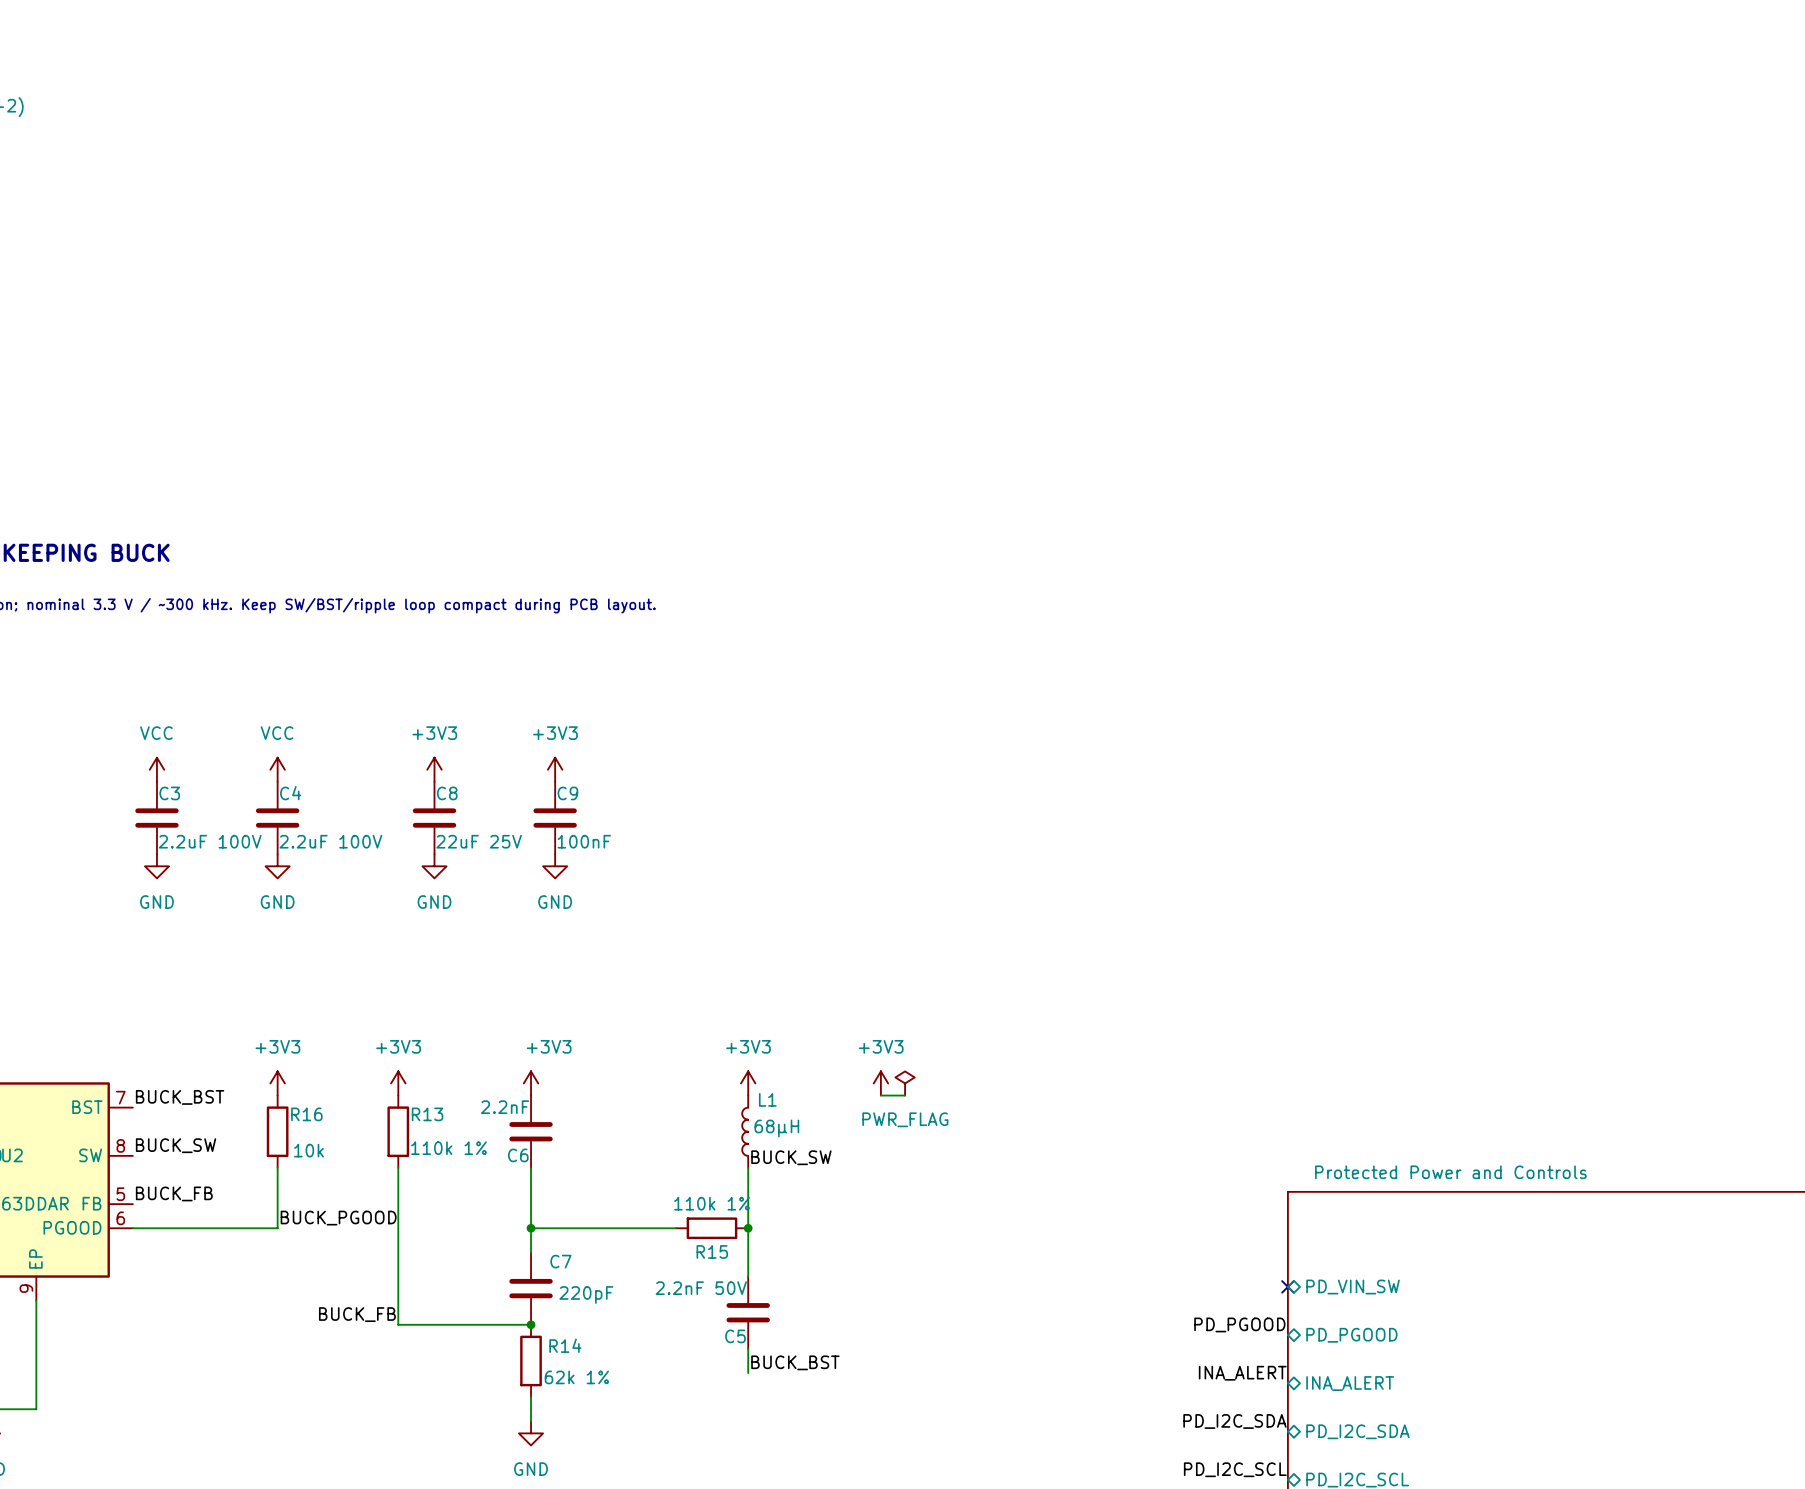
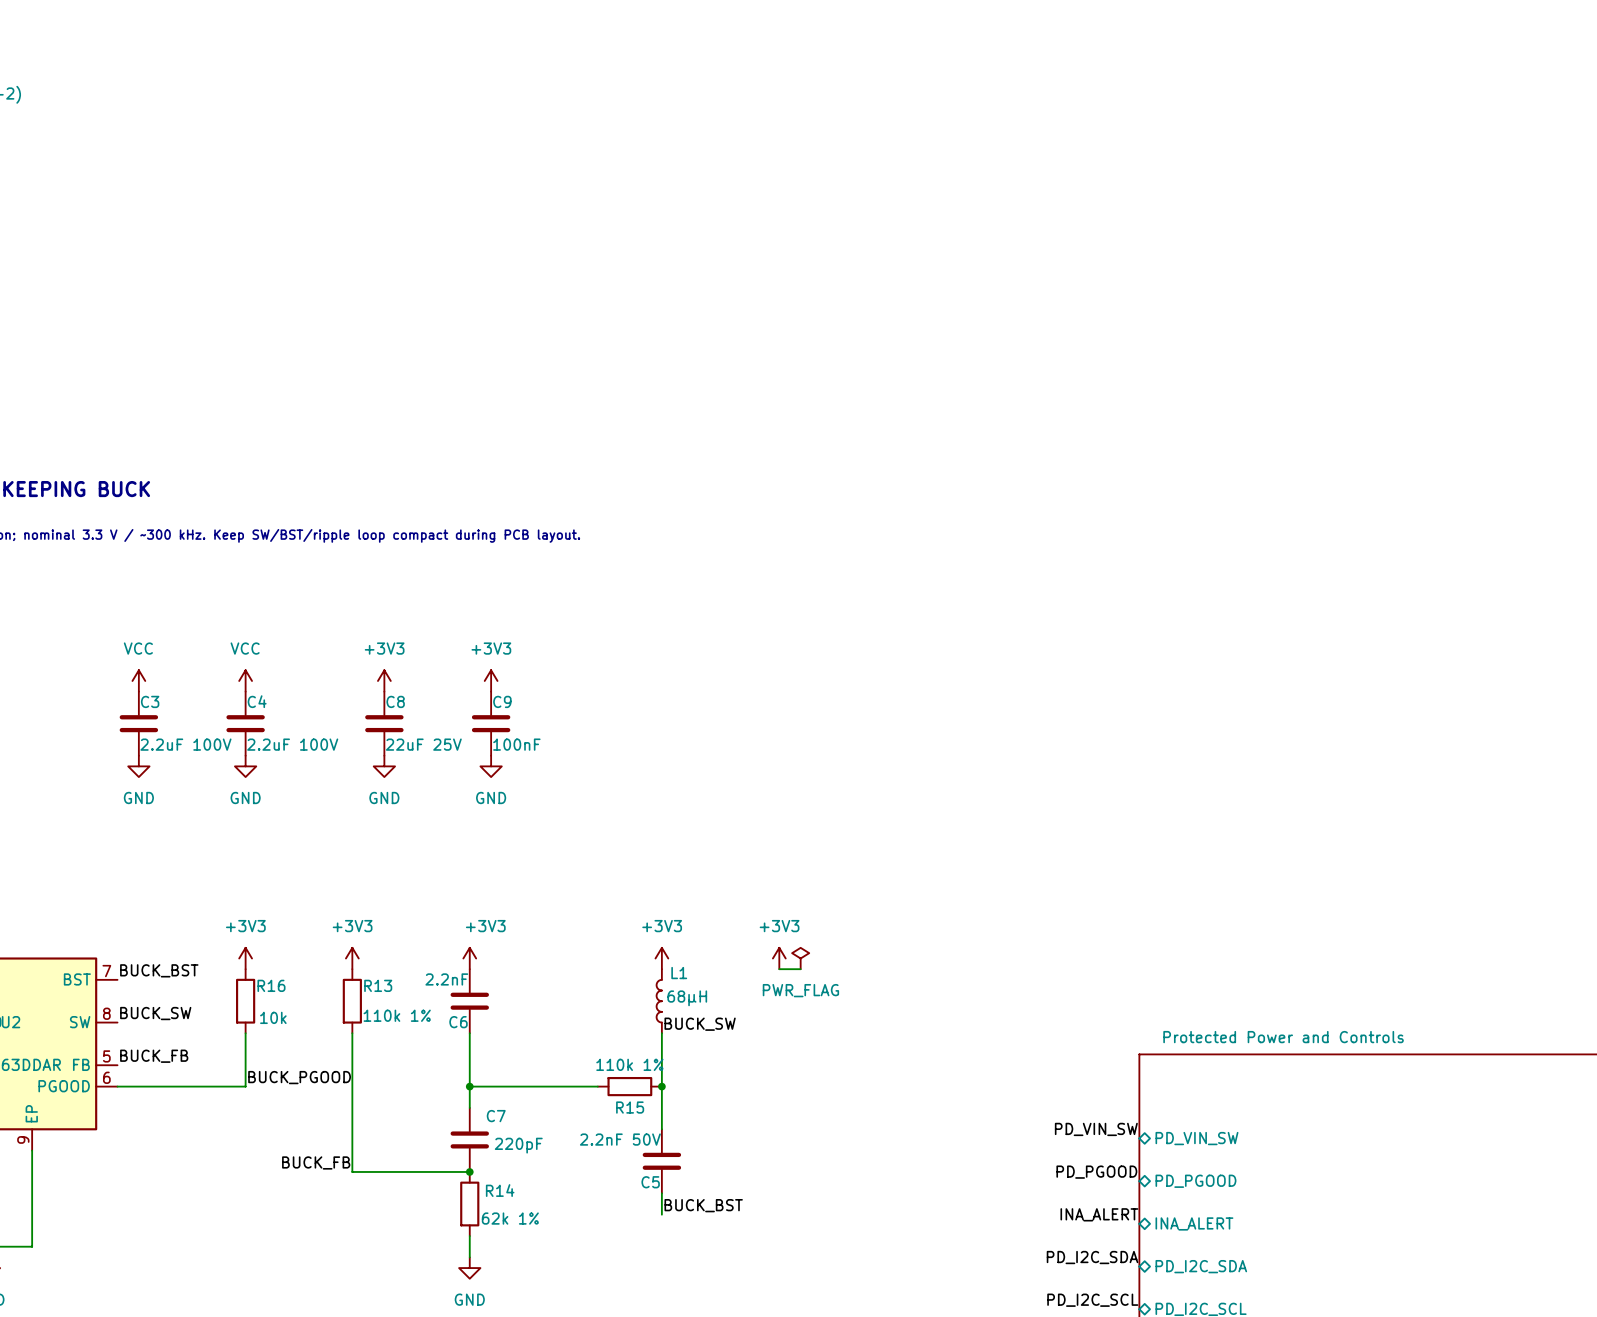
label: none -> PD_VIN_SW (1096, 1129)
no-connect mark: (1287, 1286) -> none

